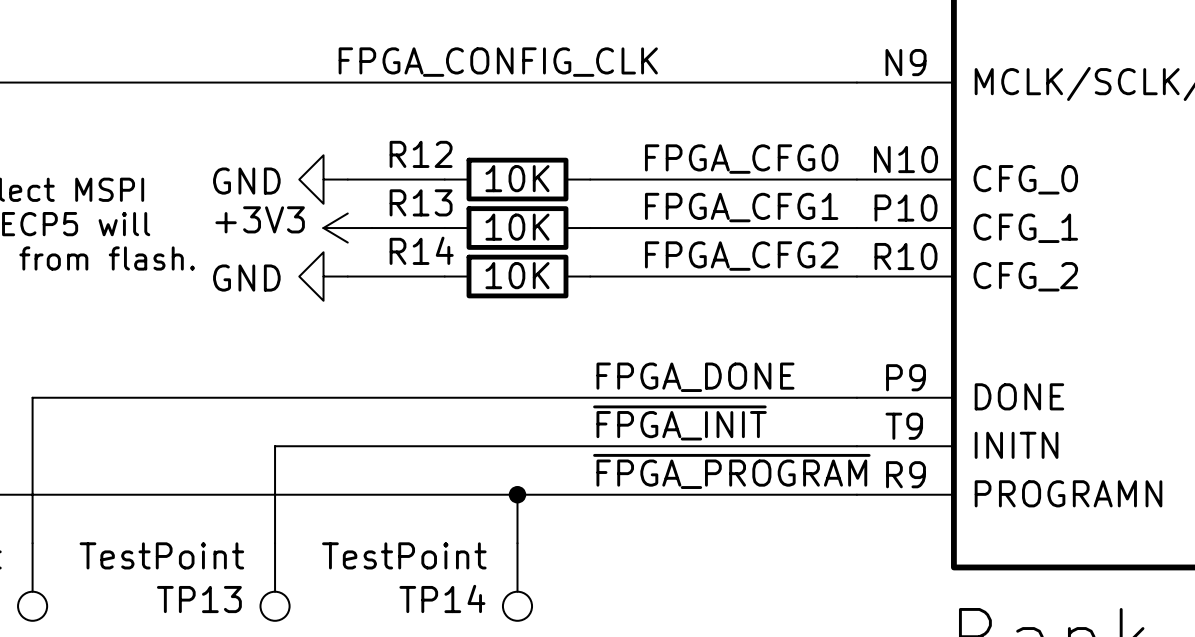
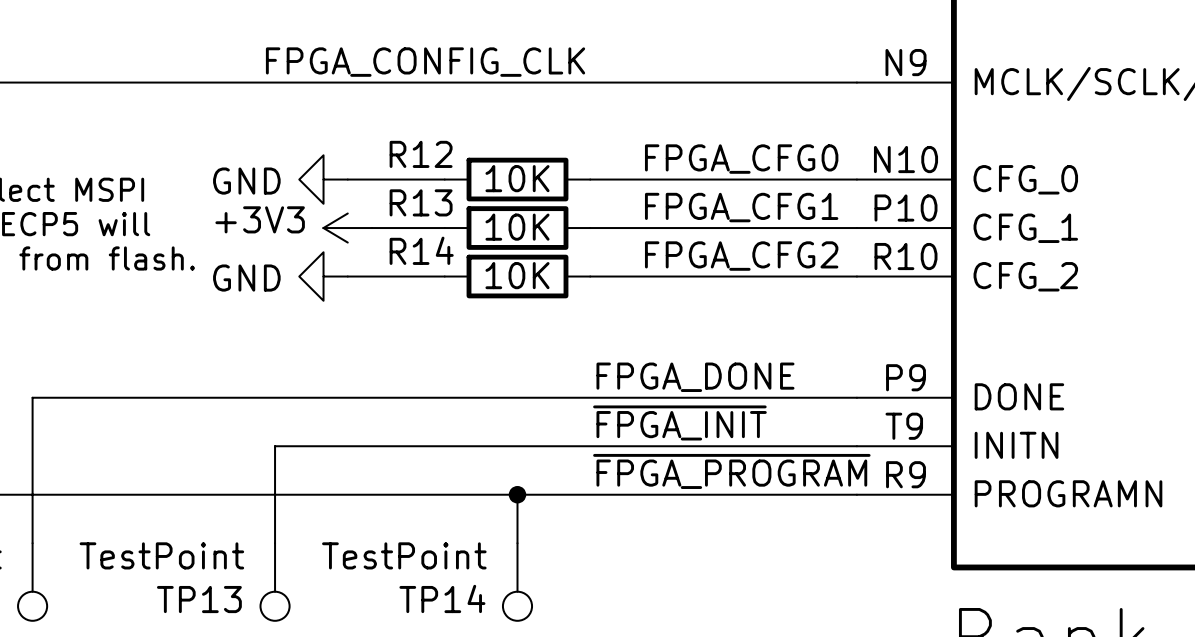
label position: FPGA_CONFIG_CLK (498, 62) -> FPGA_CONFIG_CLK (425, 62)

